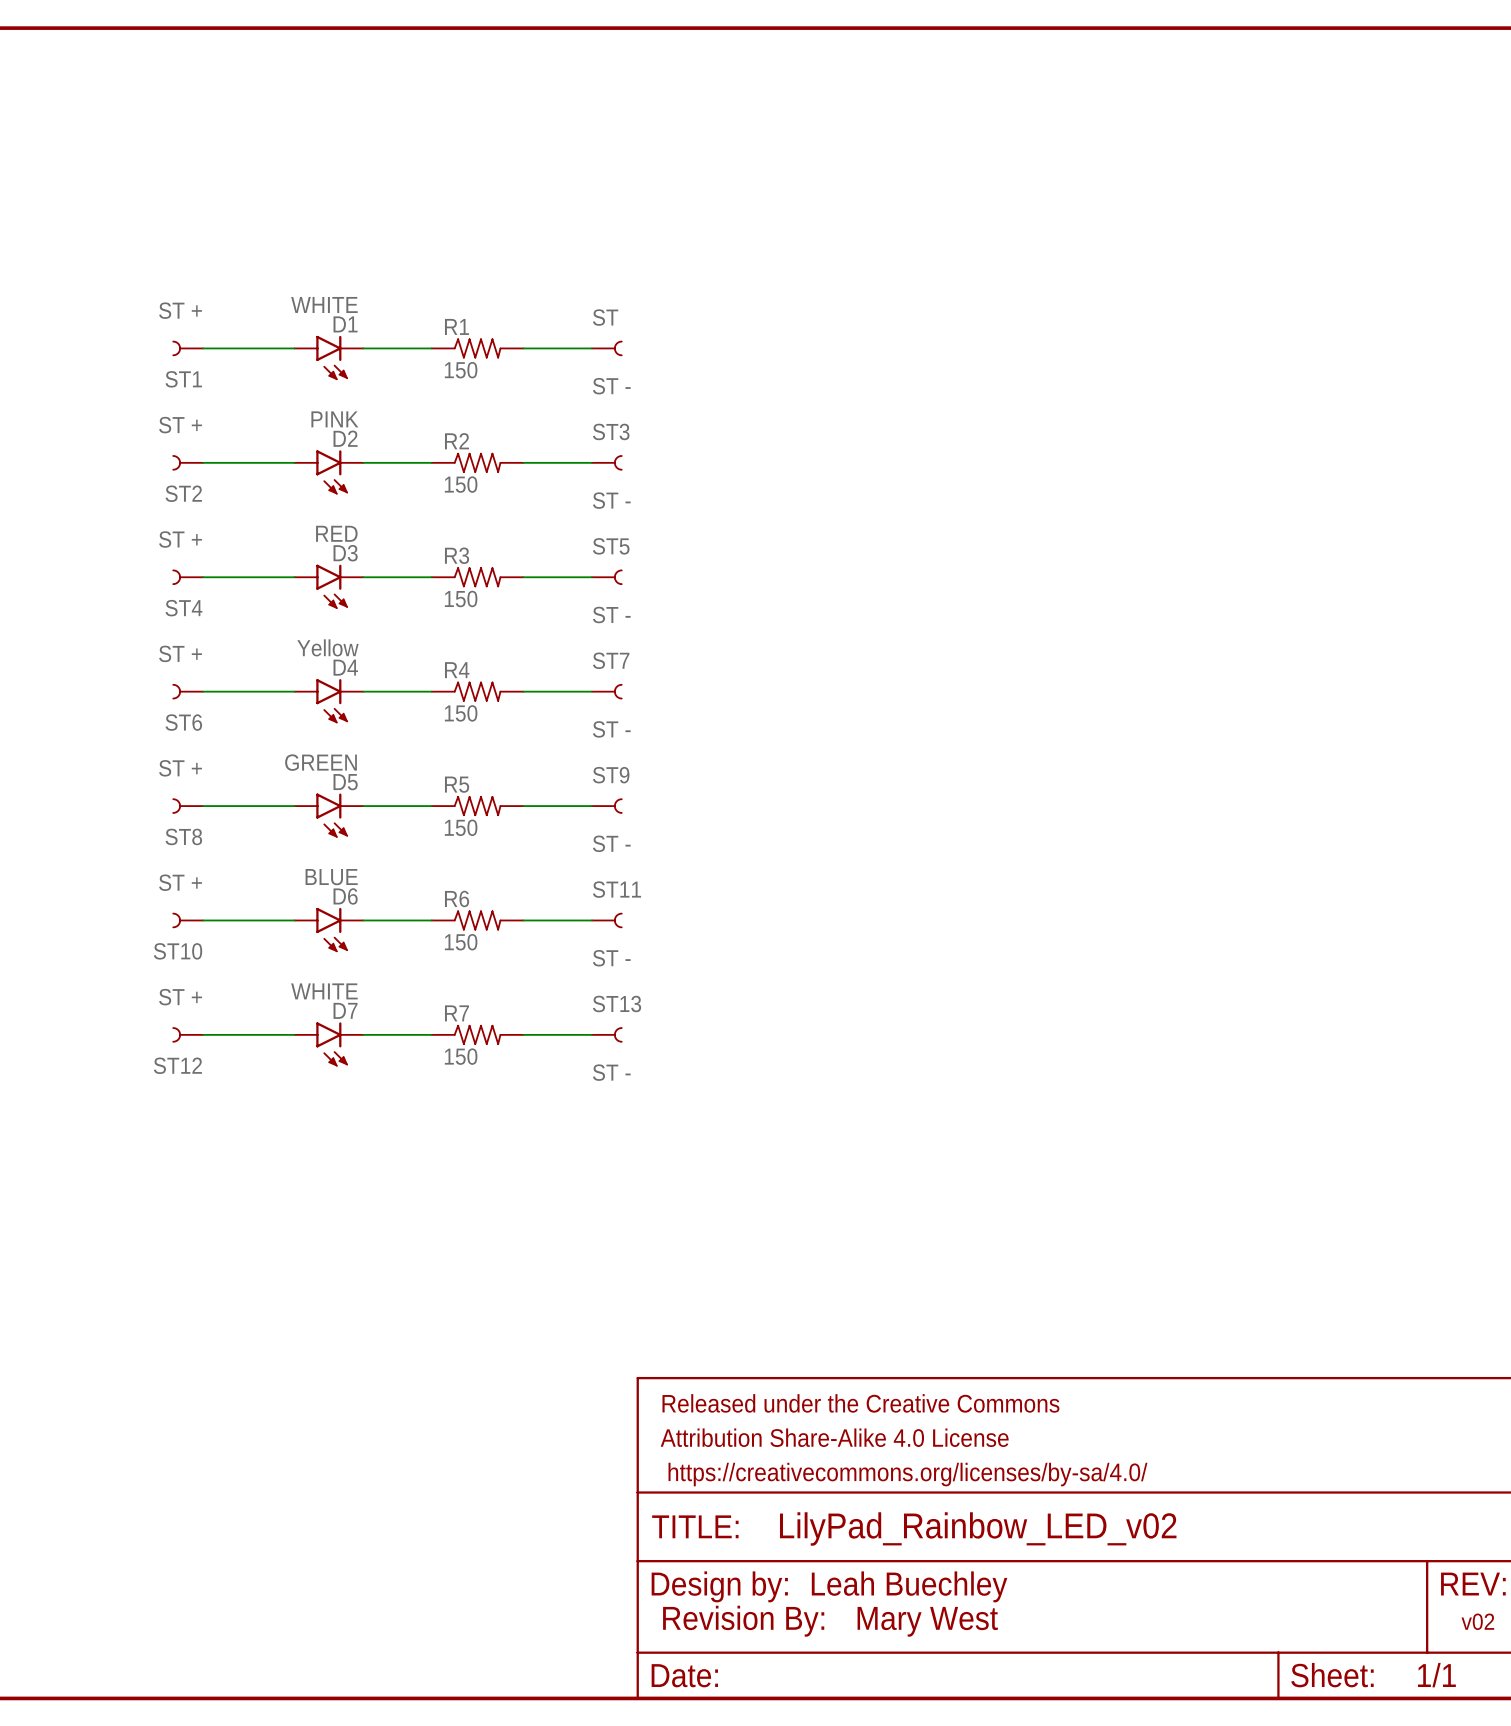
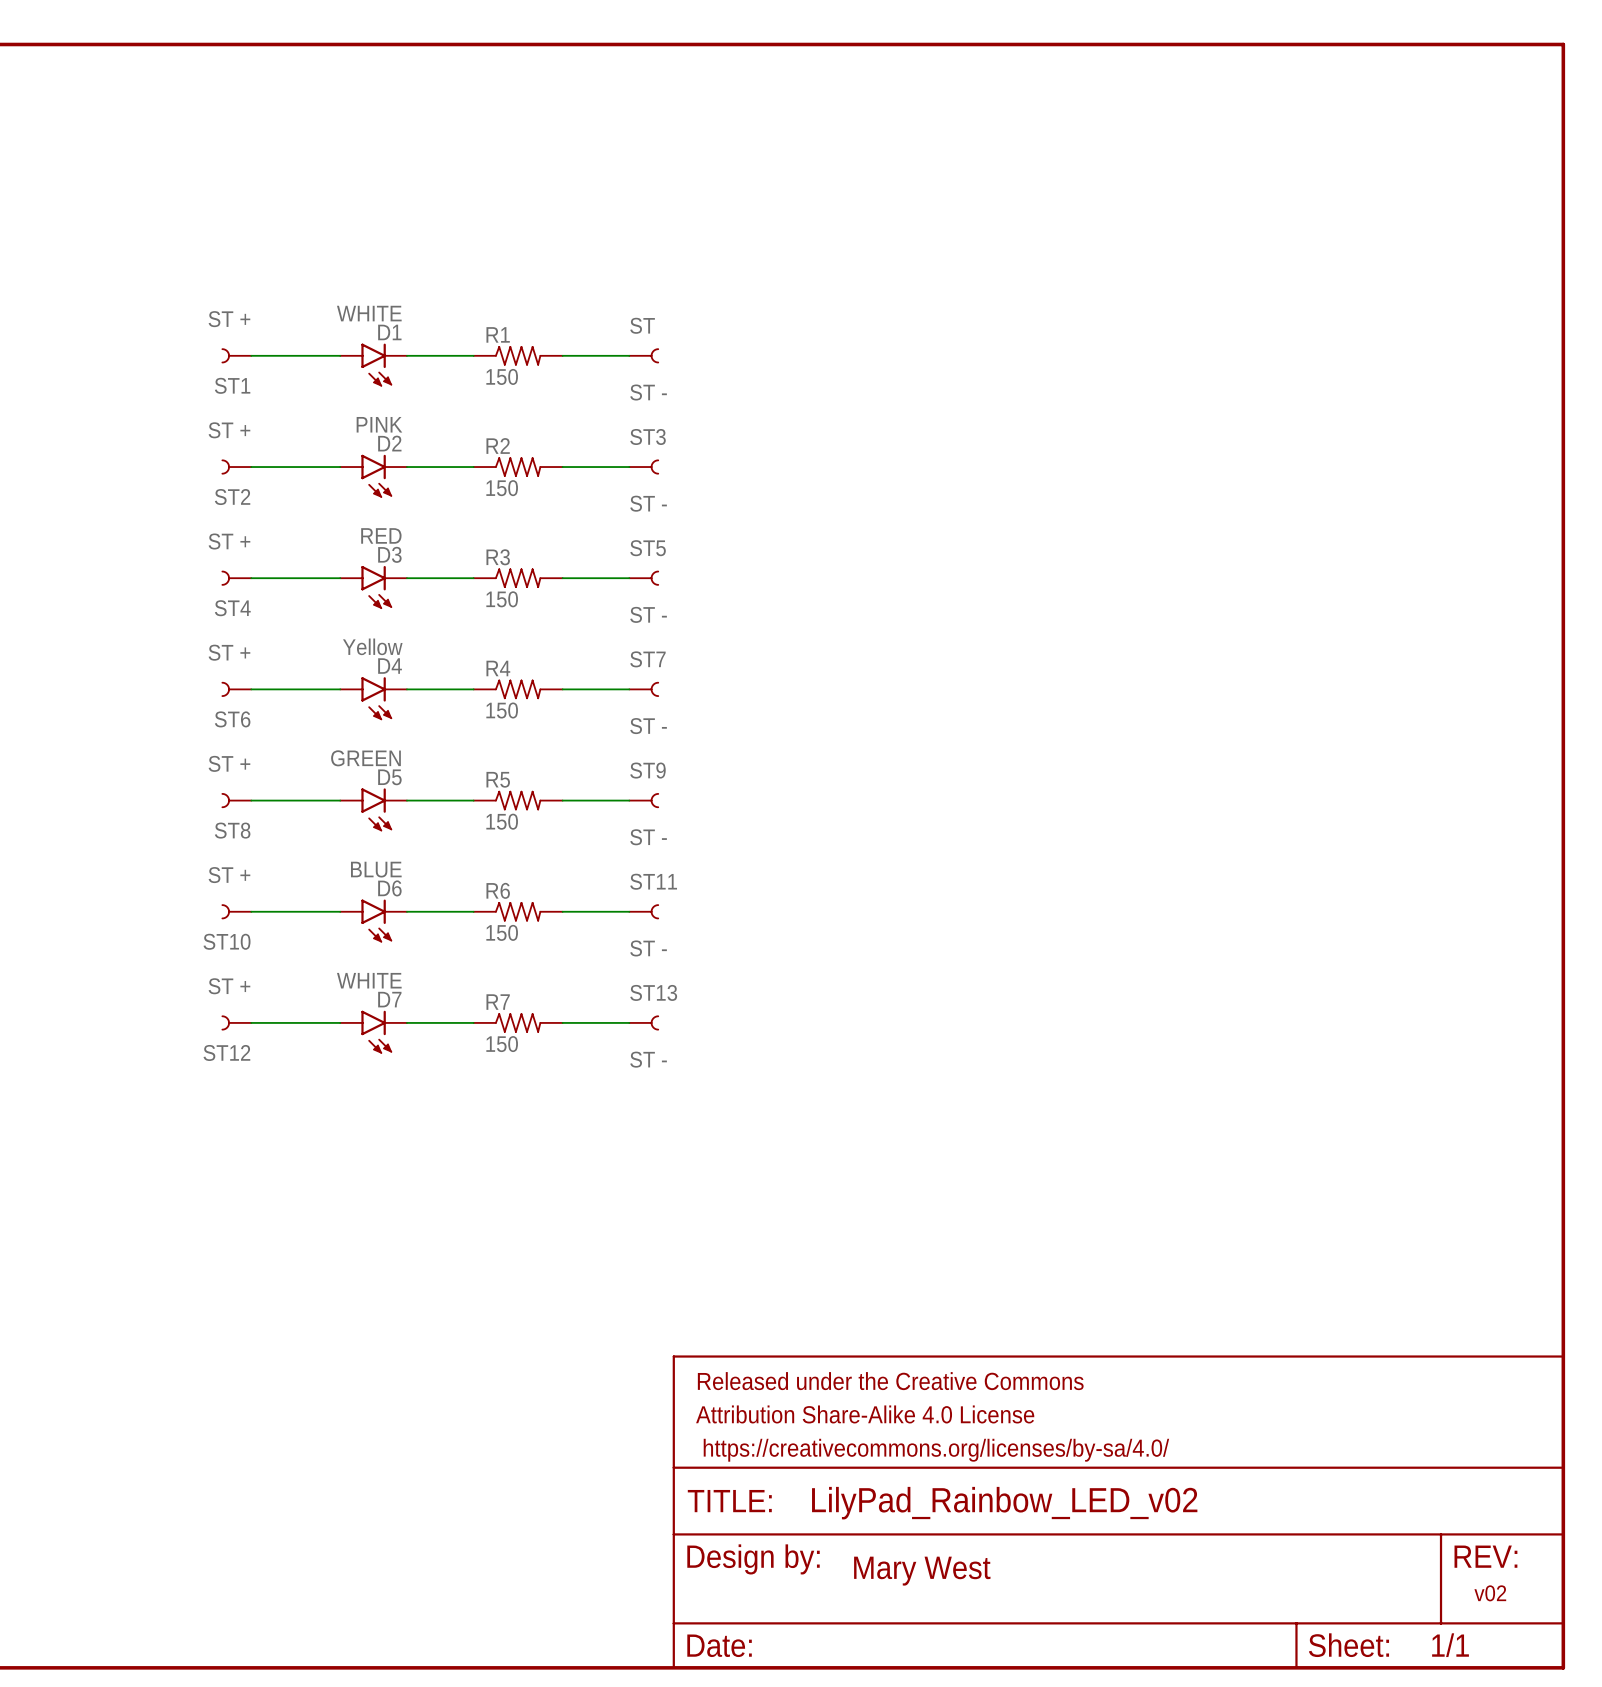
text: Leah Buechley (909, 1586) -> none
part: (743, 1621) -> none
text position: Mary West (927, 1621) -> Mary West (922, 1571)

